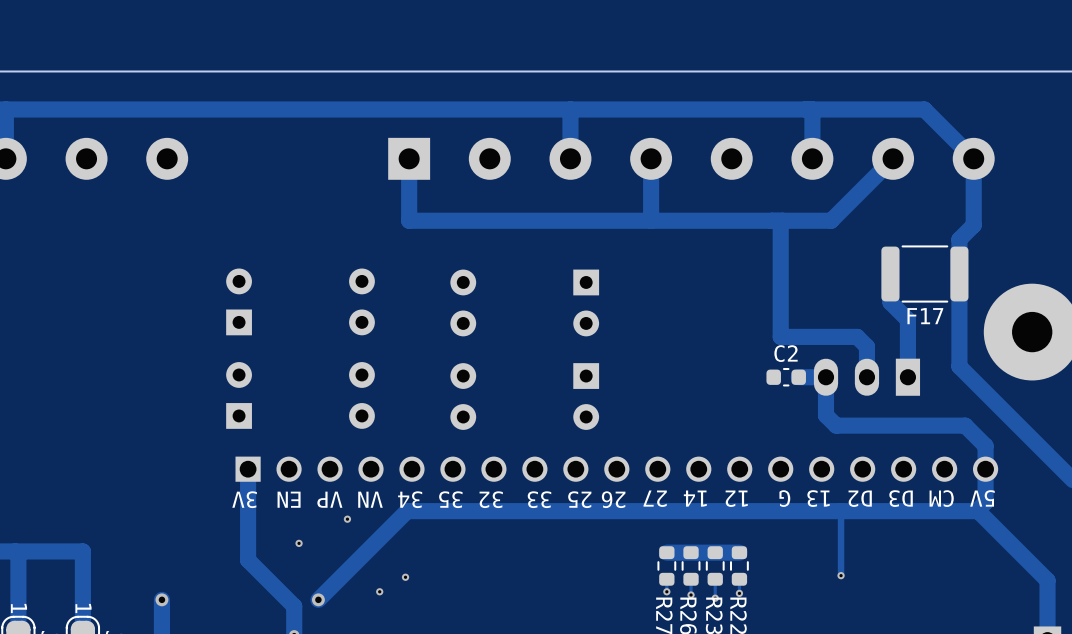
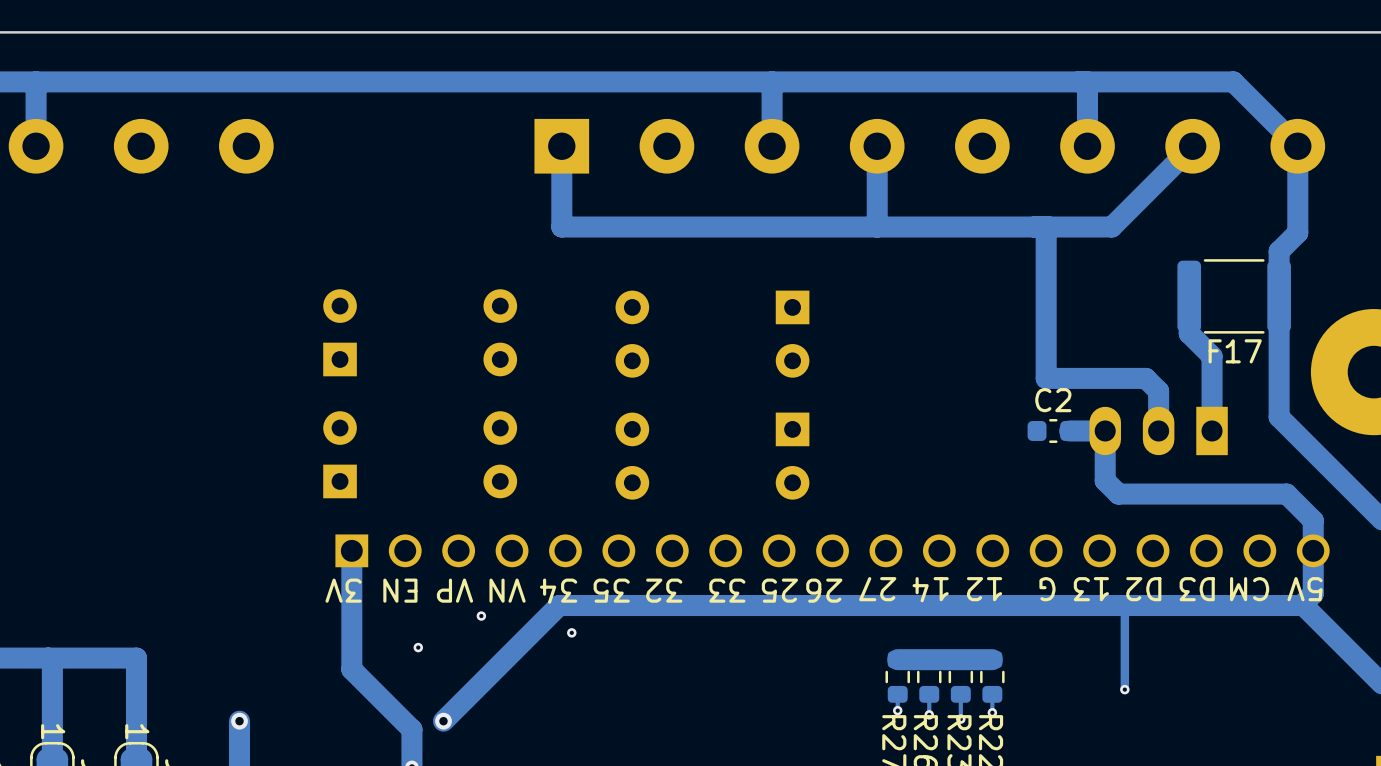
via: none -> (571, 632)
via: (405, 577) -> none
via: (379, 591) -> none

